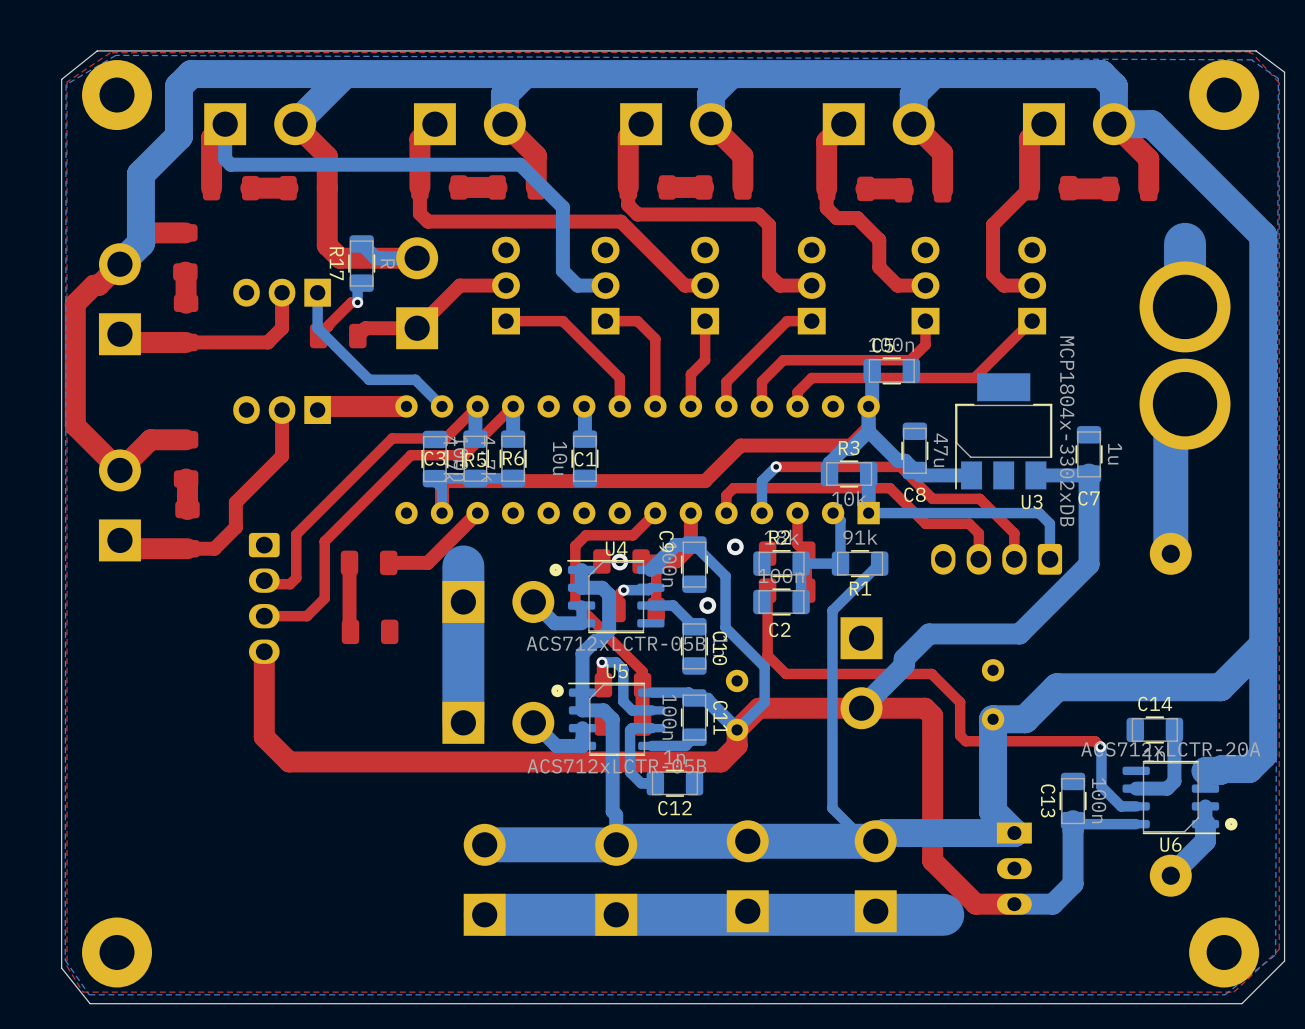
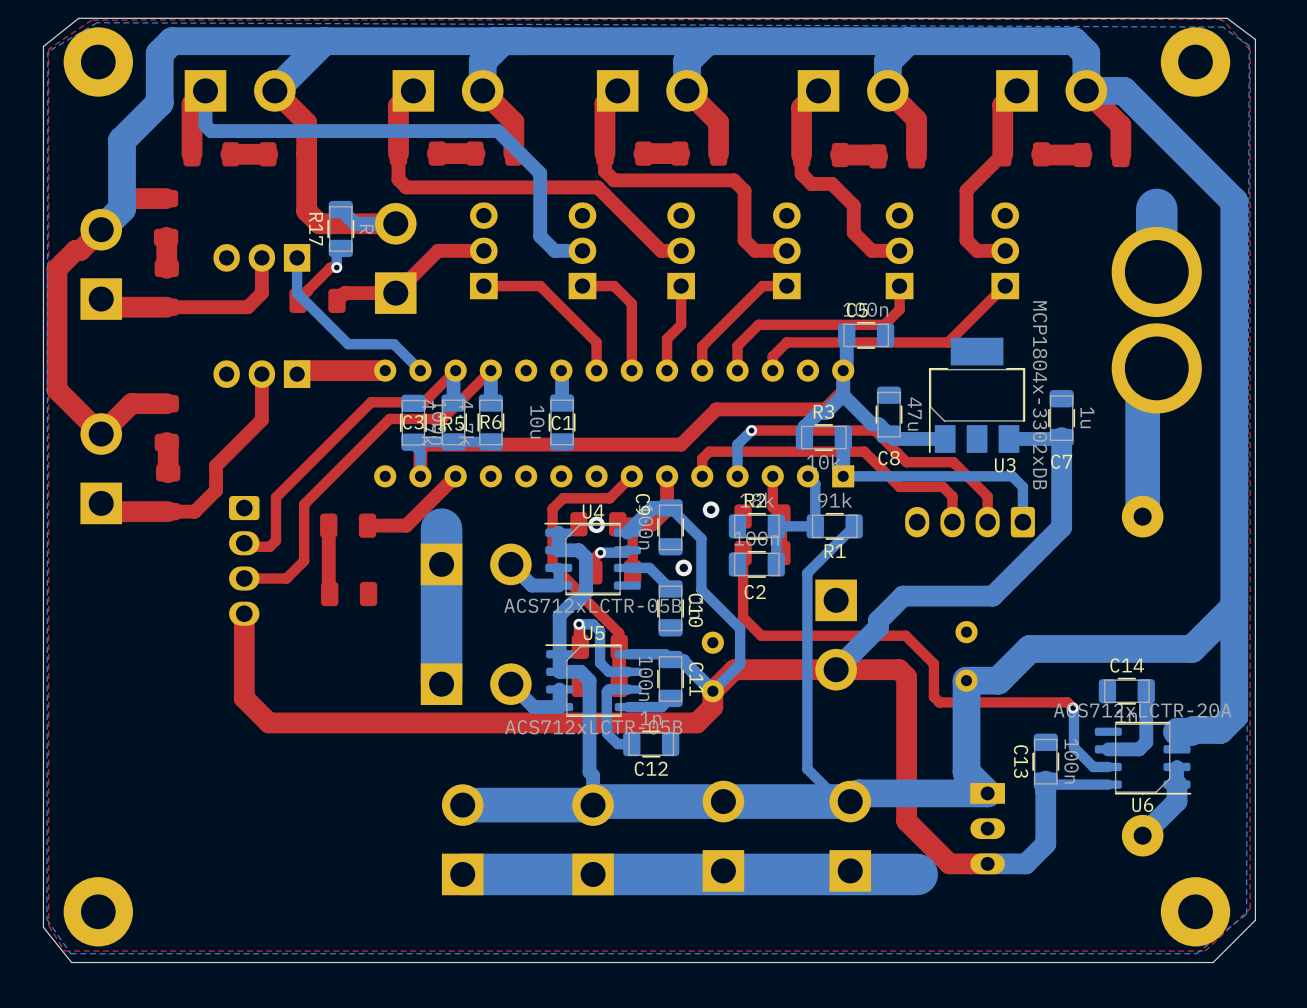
drawing: [549, 563, 563, 577] -> none
drawing: [551, 684, 564, 698] -> none
drawing: [1224, 817, 1238, 831] -> none

